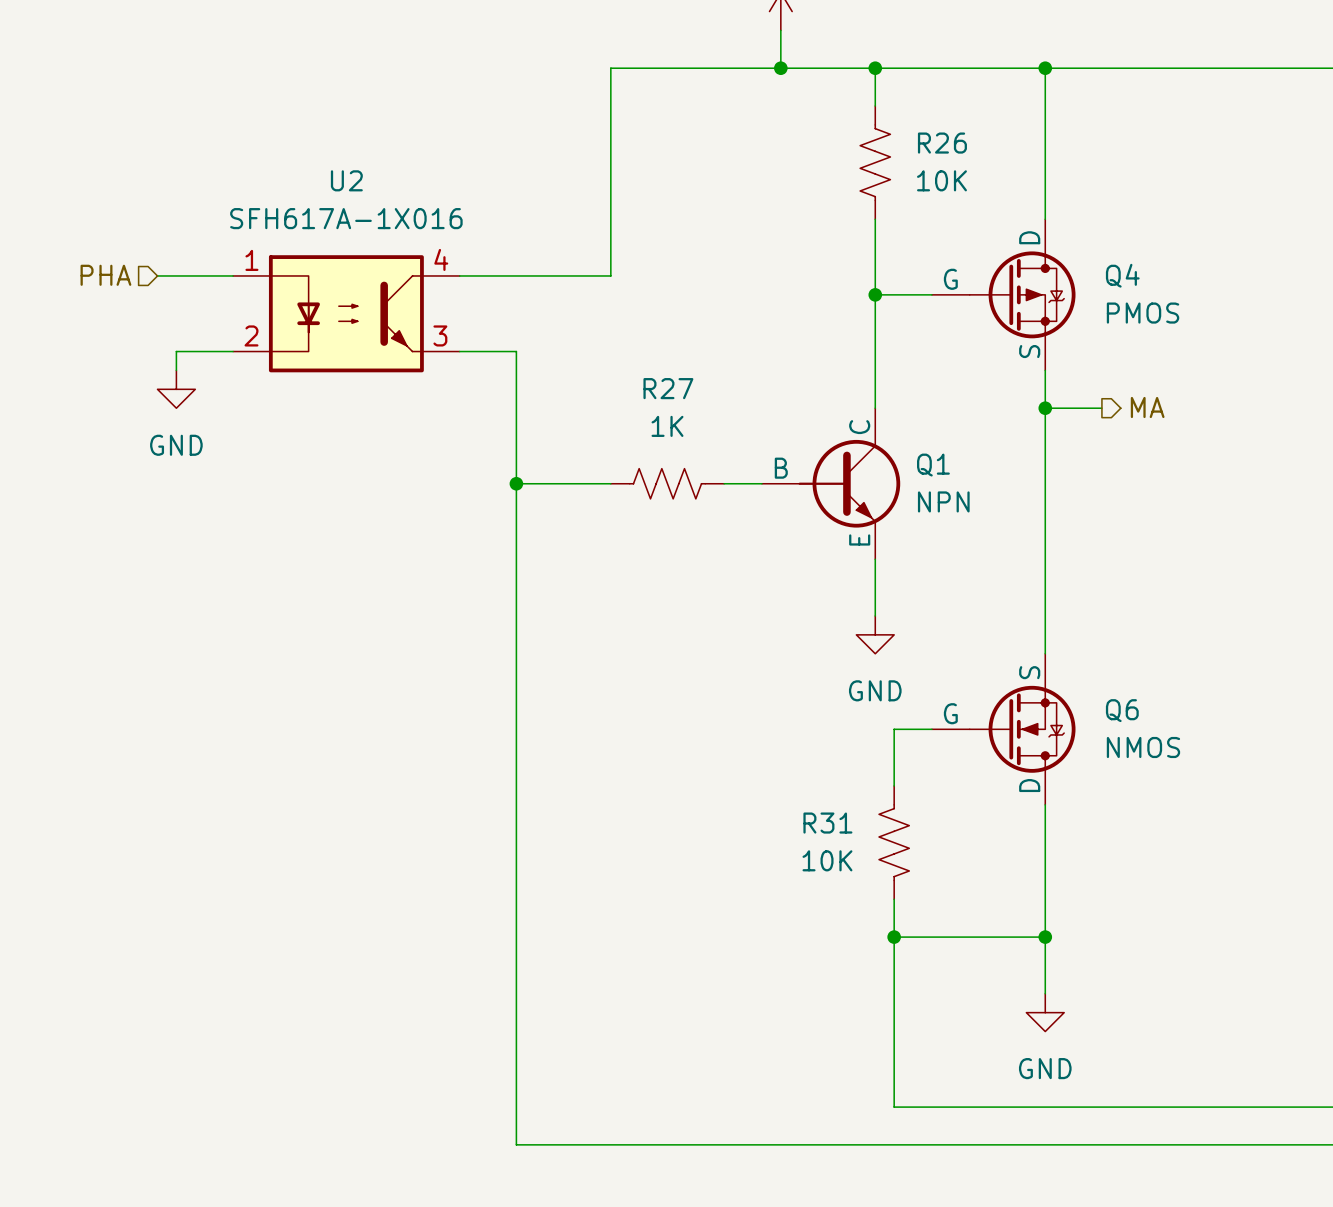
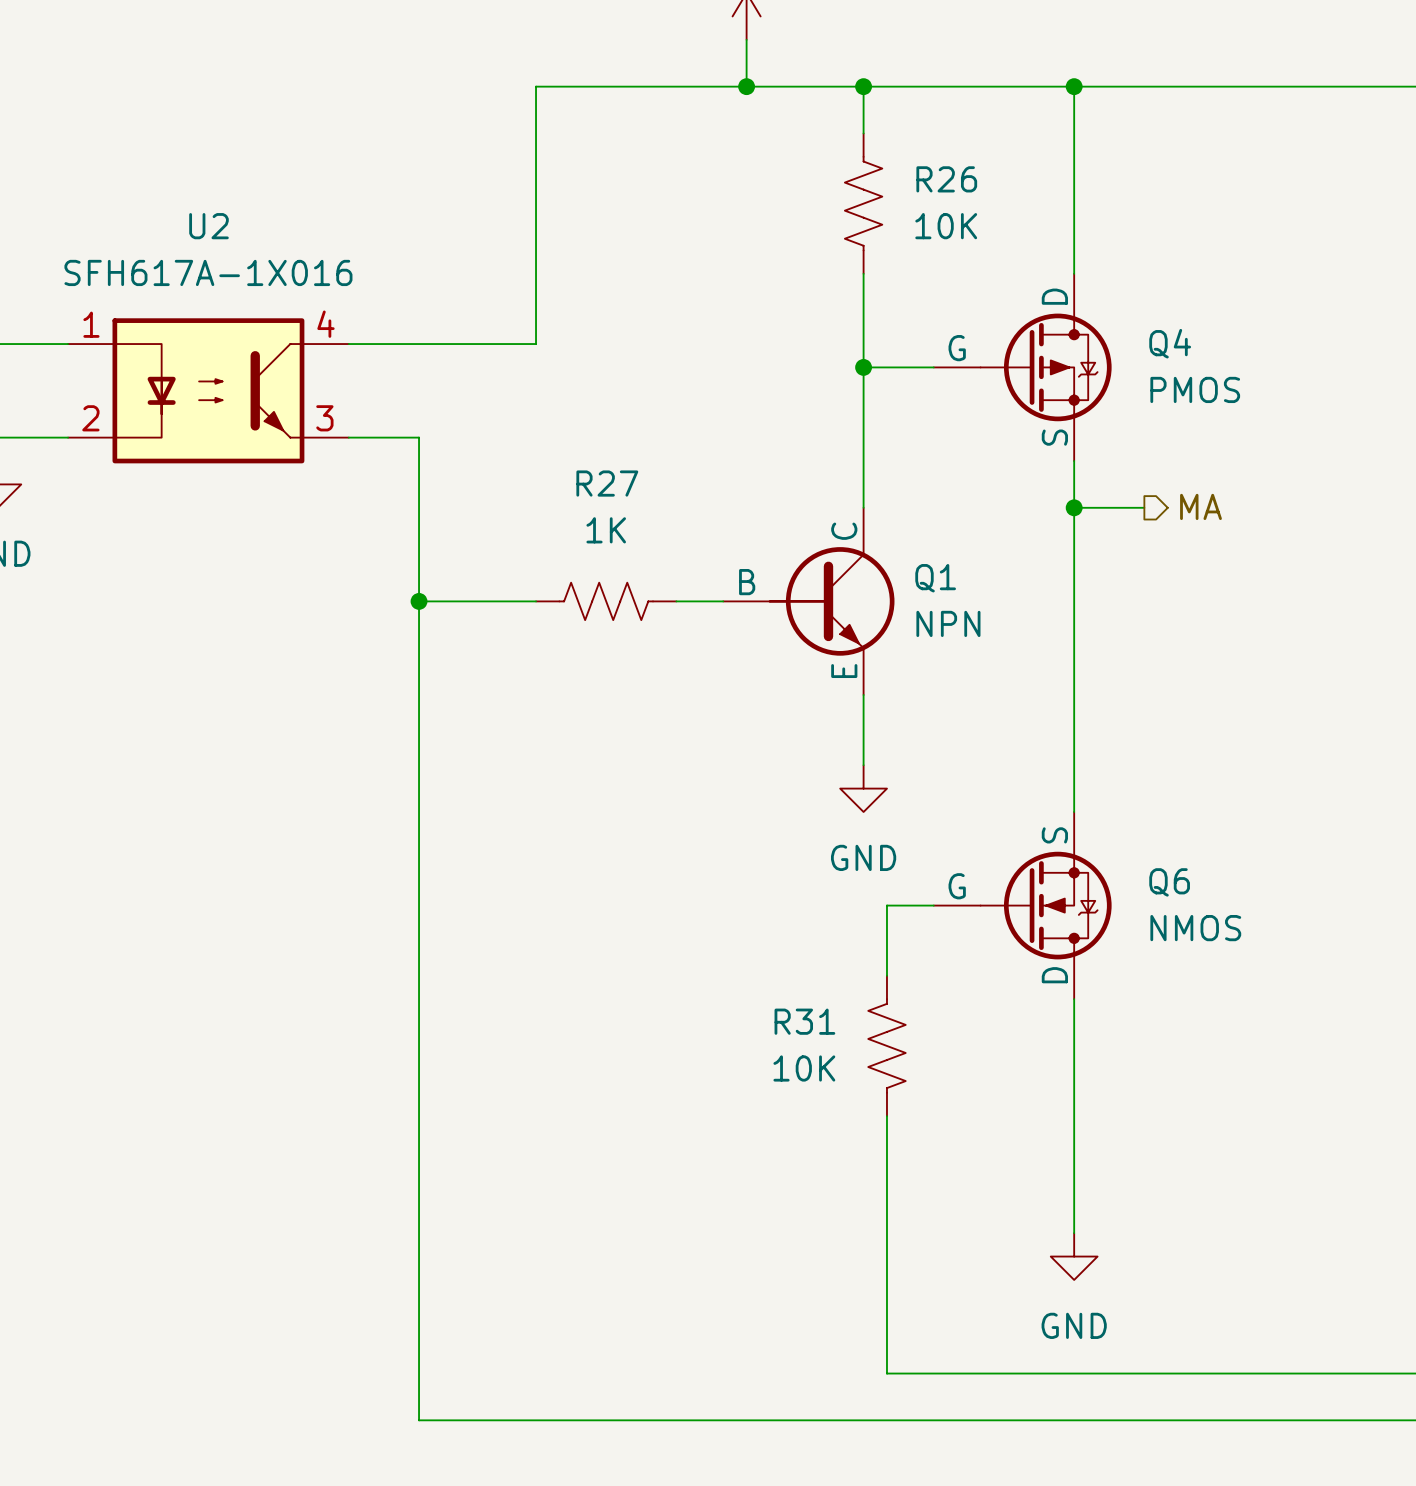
wire: (894, 937) (1045, 937) -> none
junction: (894, 937) -> none
junction: (1045, 937) -> none

